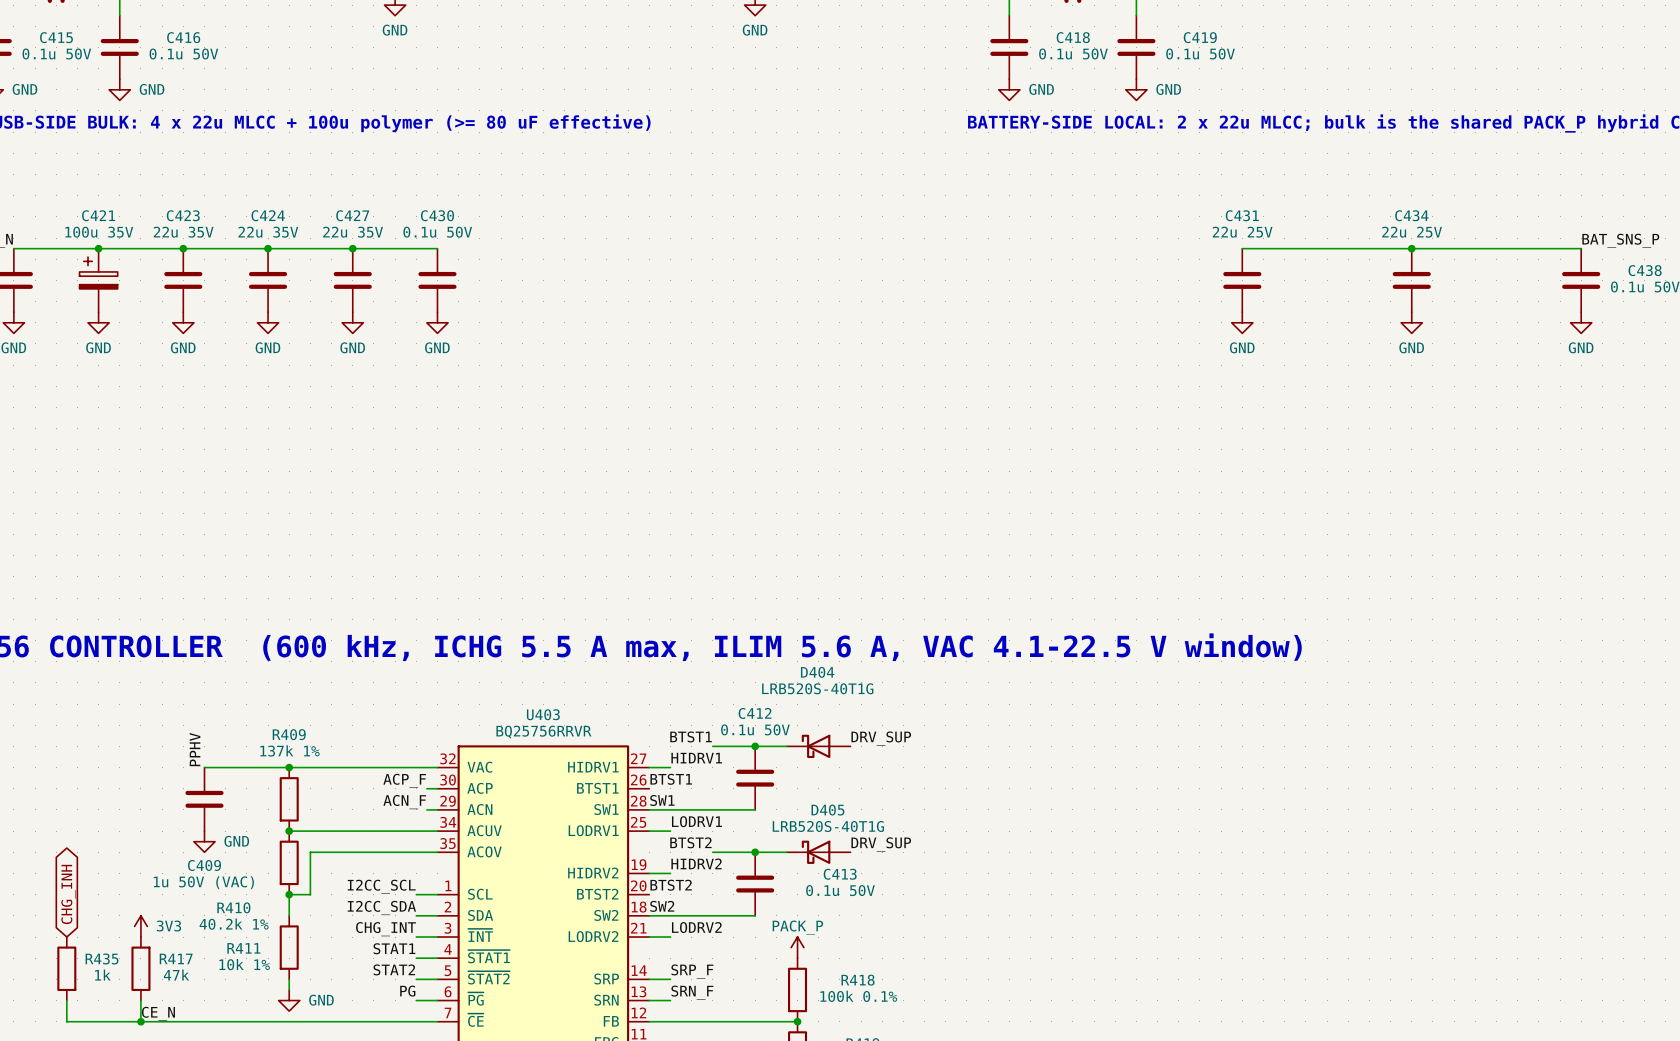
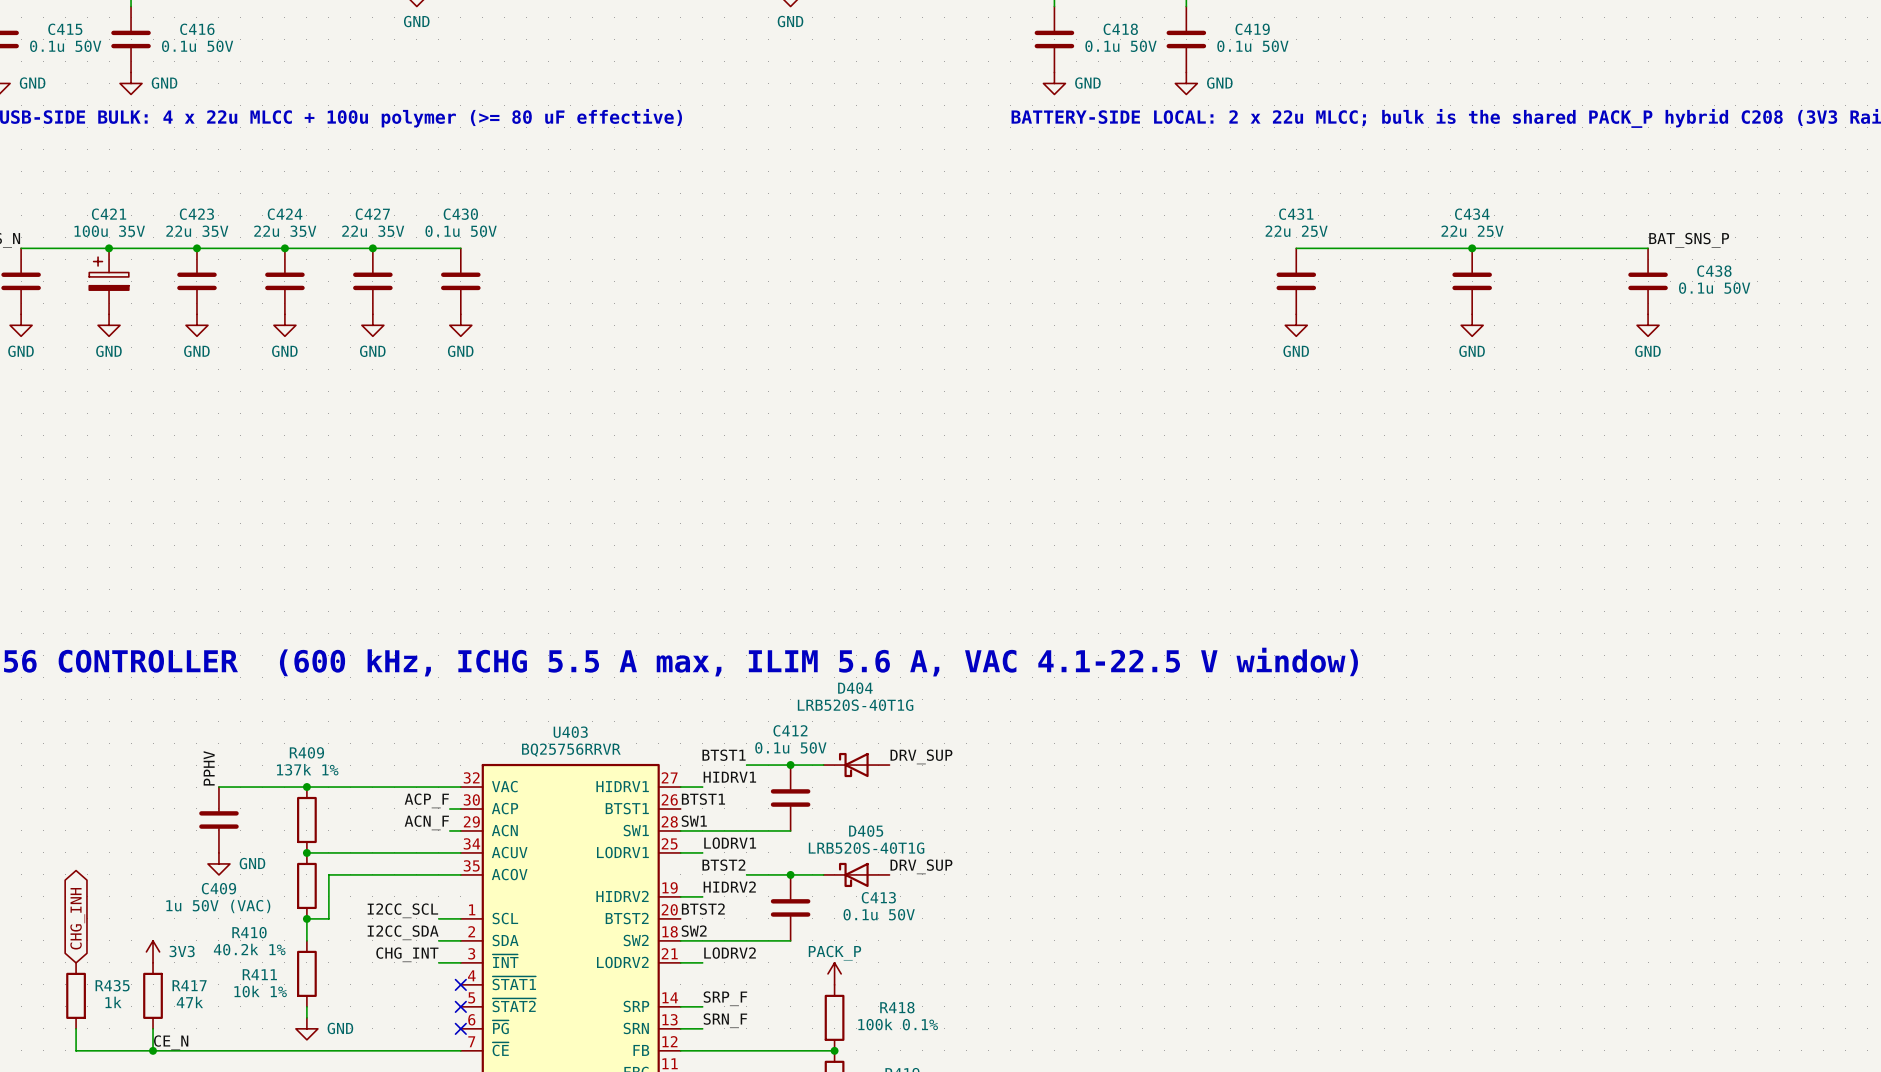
label: STAT1 (394, 948) -> none
wire: (416, 958) (437, 958) -> none
no-connect mark: none -> (460, 984)
label: STAT2 (394, 969) -> none
wire: (416, 979) (437, 979) -> none
no-connect mark: none -> (460, 1006)
label: PG (407, 991) -> none
wire: (416, 1000) (437, 1000) -> none
no-connect mark: none -> (460, 1028)

